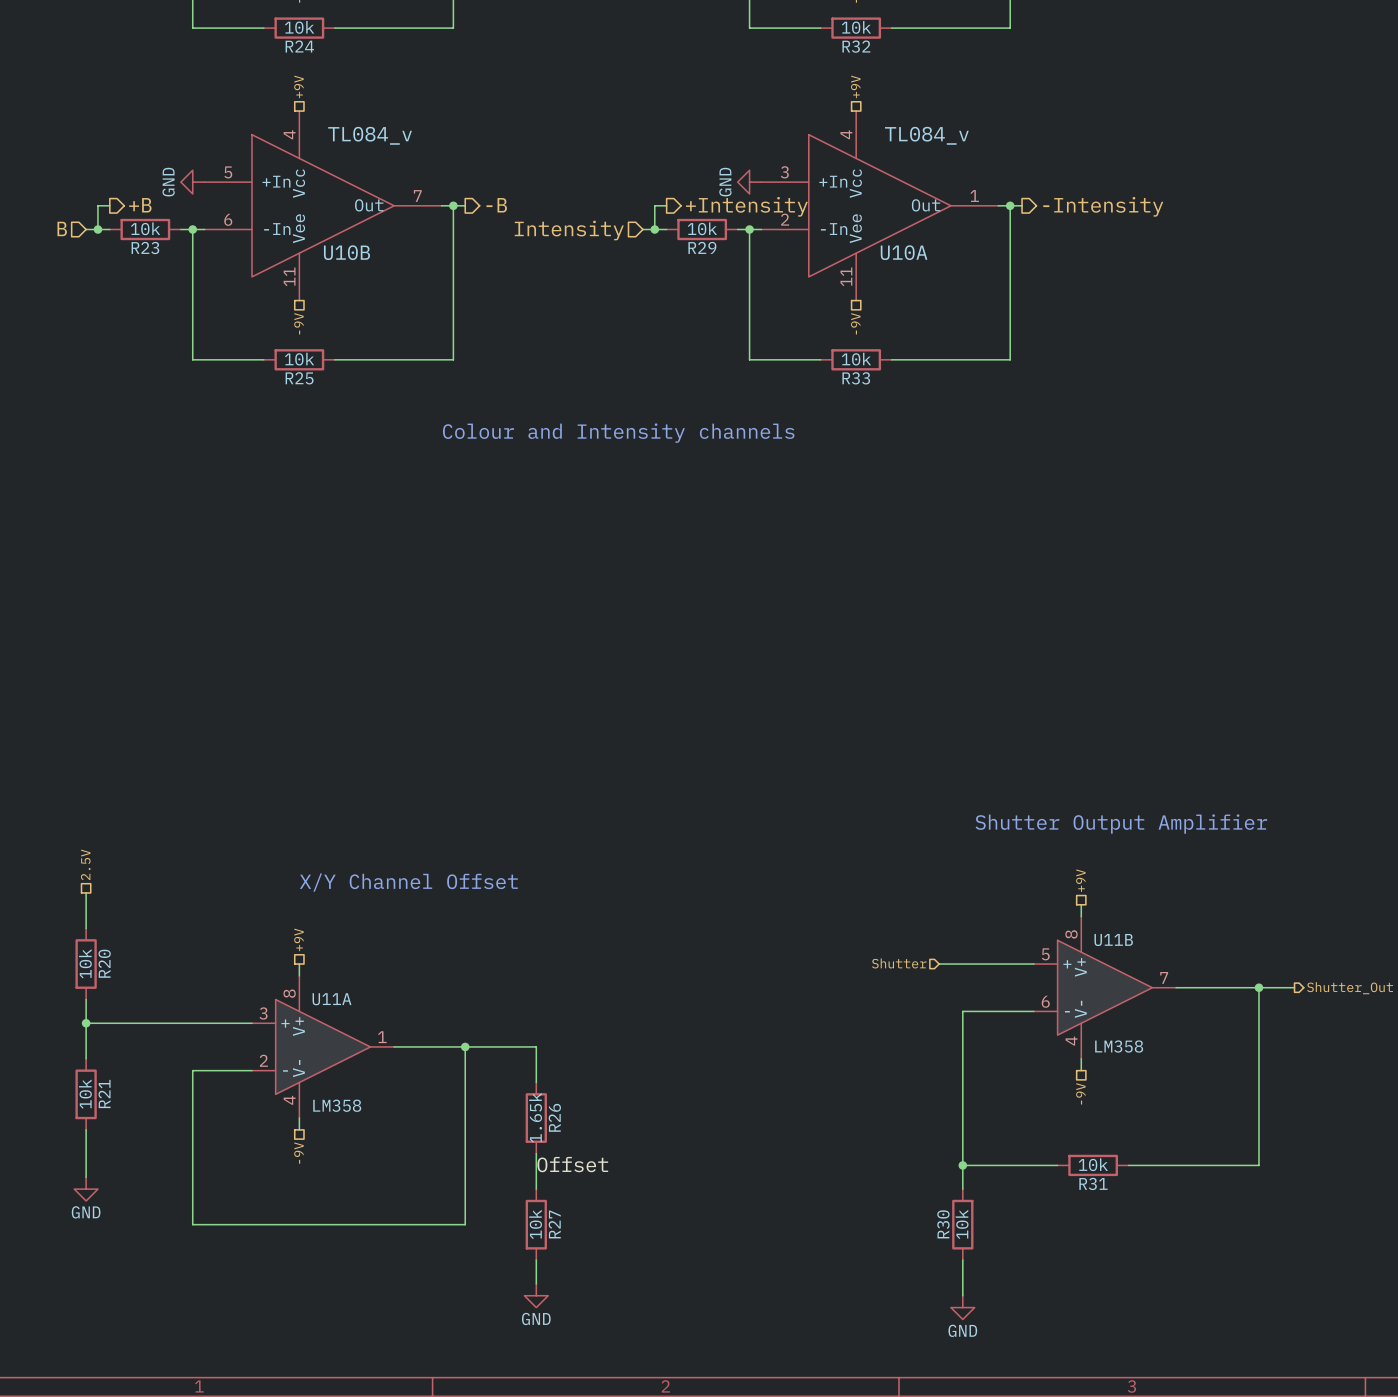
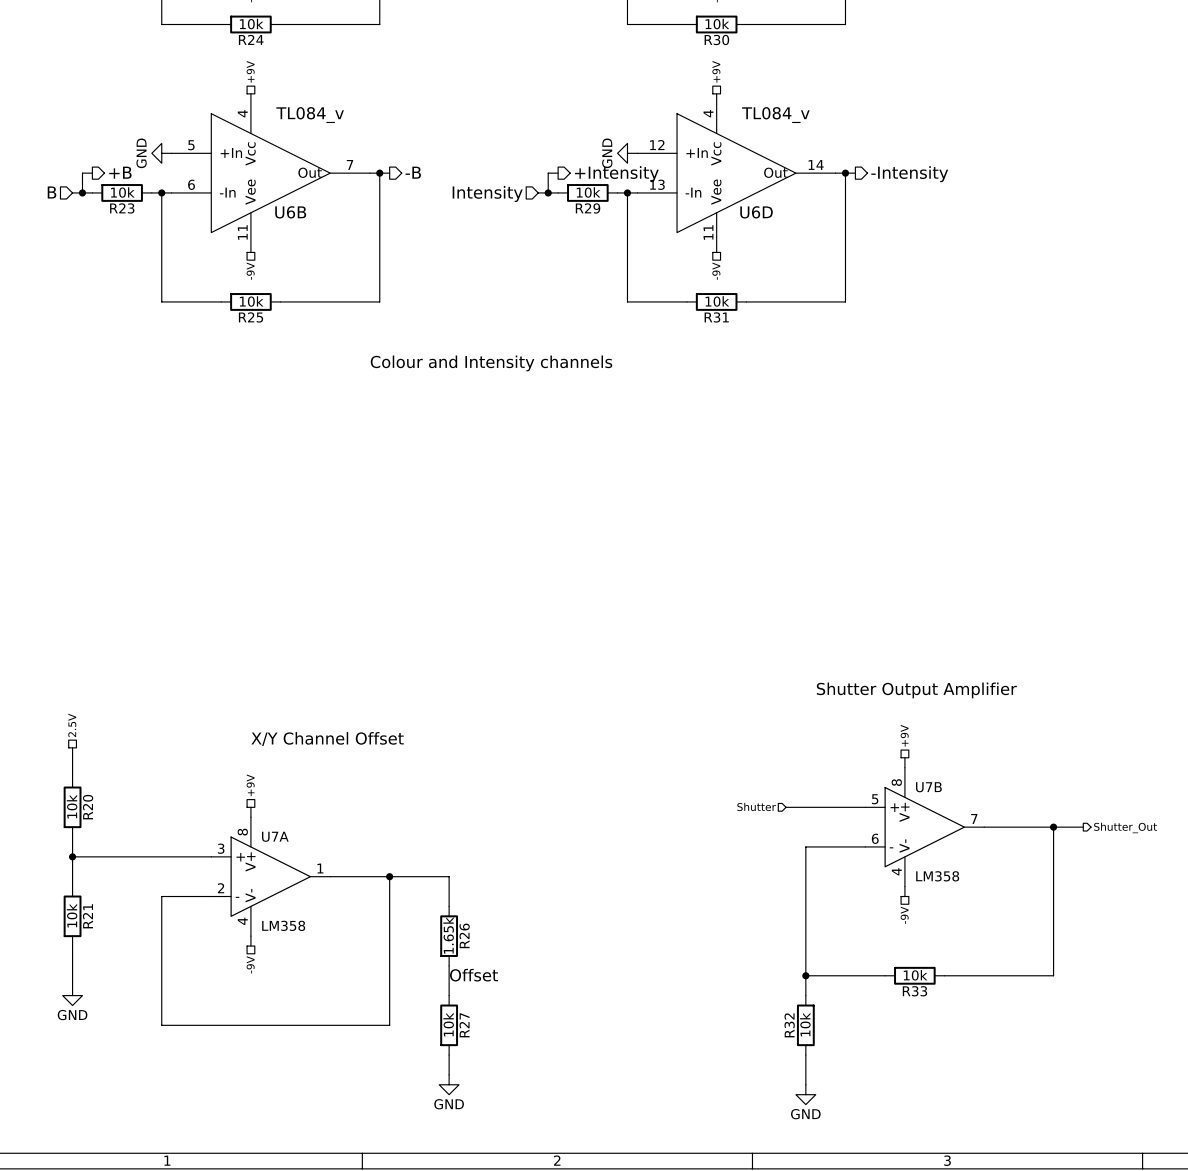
R32 name: R32 (856, 46) -> R30 (716, 40)
U10A pin number: 3 (784, 172) -> 12 (657, 145)
U10A pin number: 1 (974, 196) -> 14 (816, 164)
U10A pin number: 2 (785, 219) -> 13 (657, 184)
U10B name: U10B (346, 252) -> U6B (290, 212)
U10A name: U10A (904, 252) -> U6D (756, 212)
R33 name: R33 (856, 378) -> R31 (716, 317)
U11B name: U11B (1113, 939) -> U7B (928, 787)
U11A name: U11A (332, 999) -> U7A (275, 836)
R31 name: R31 (1093, 1183) -> R33 (914, 991)
R30 name: R30 (943, 1224) -> R32 (789, 1025)

